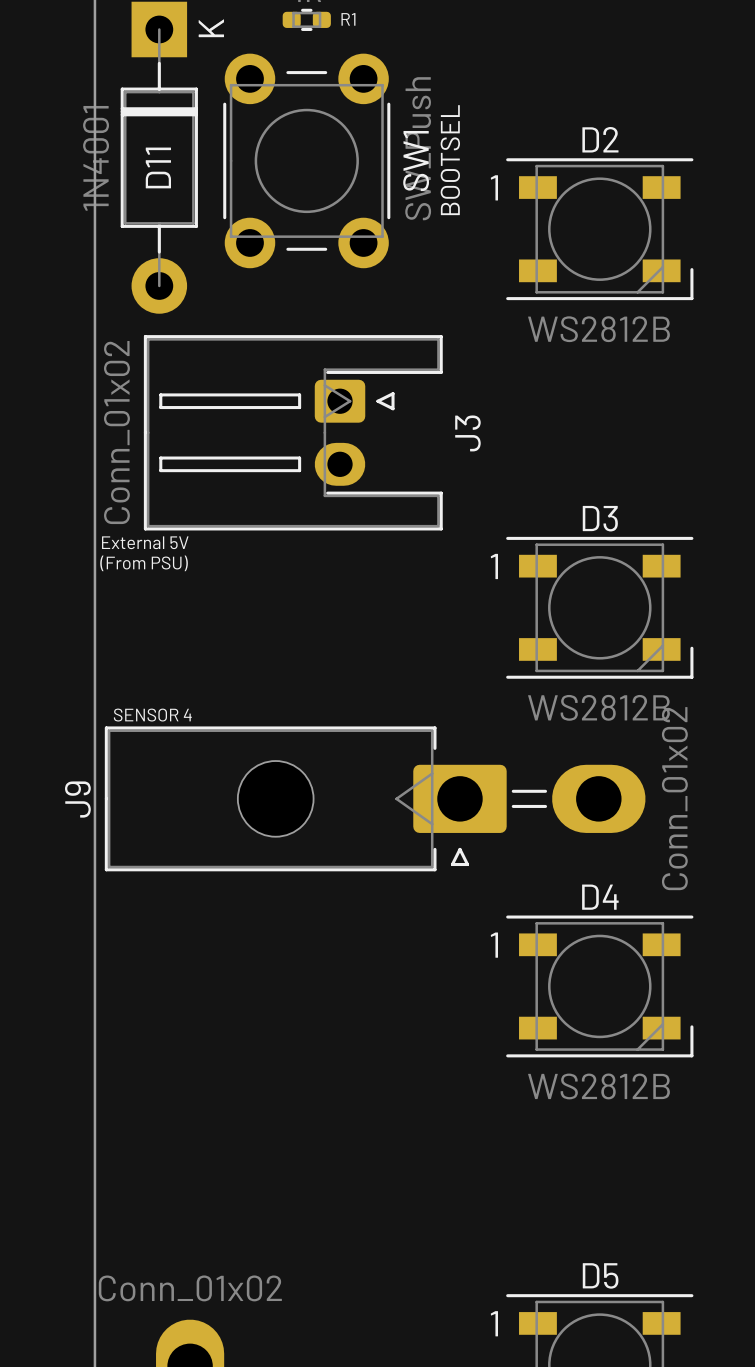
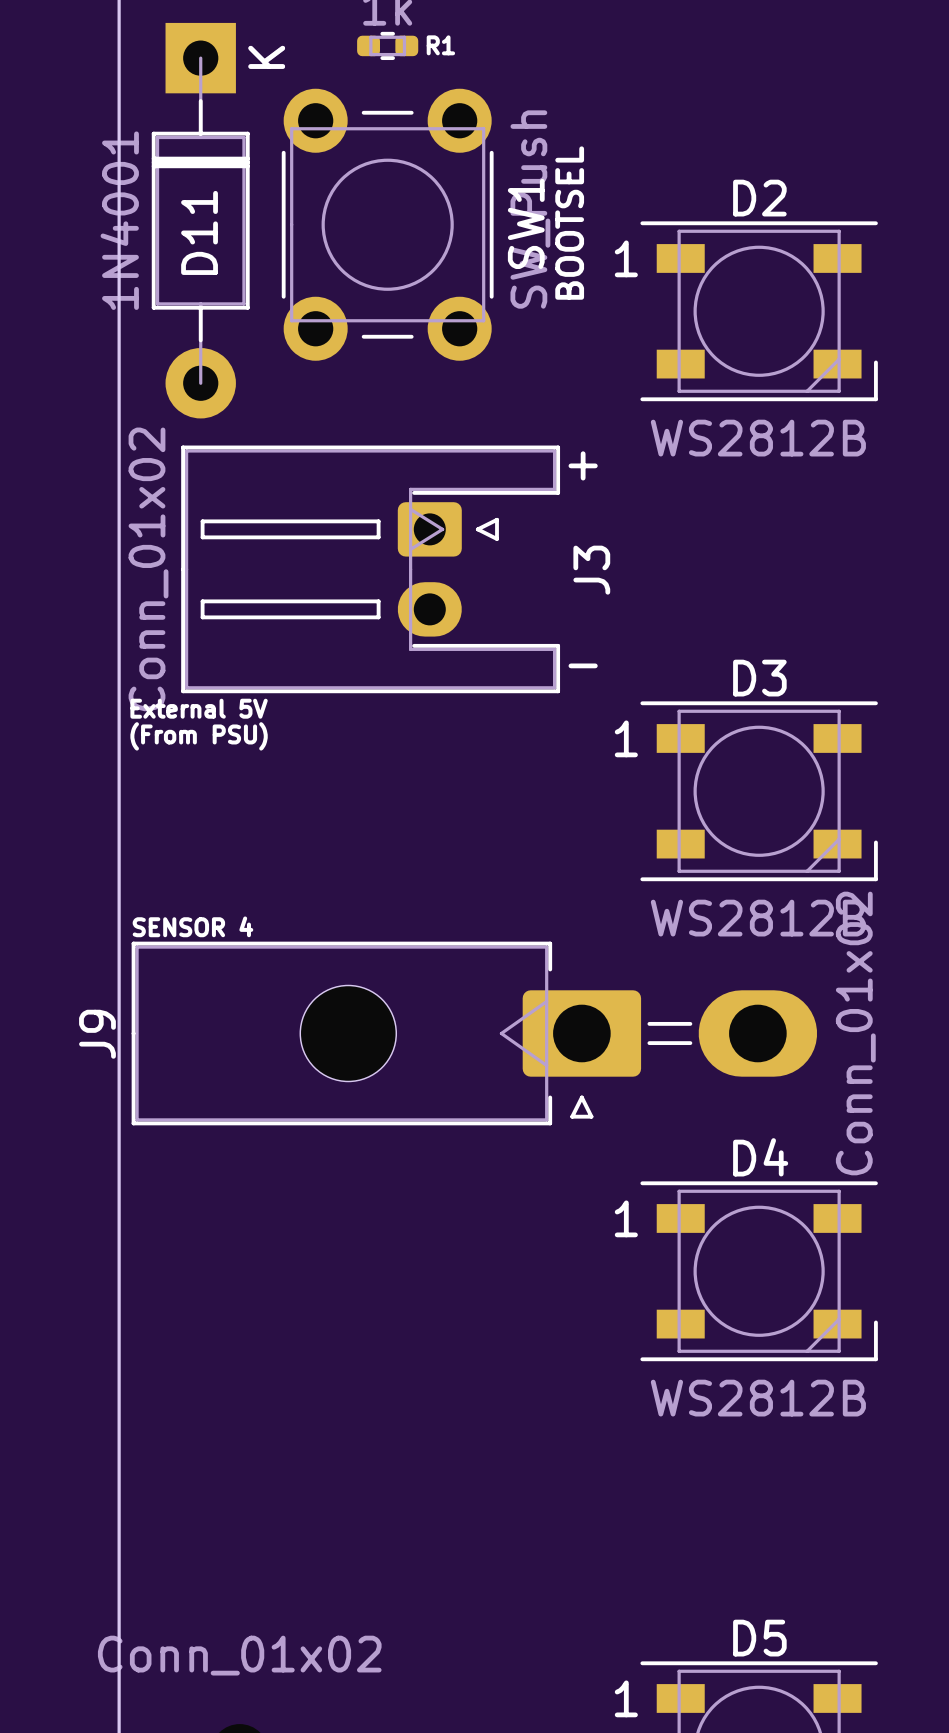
text: none -> + (583, 465)
text: none -> - (583, 665)

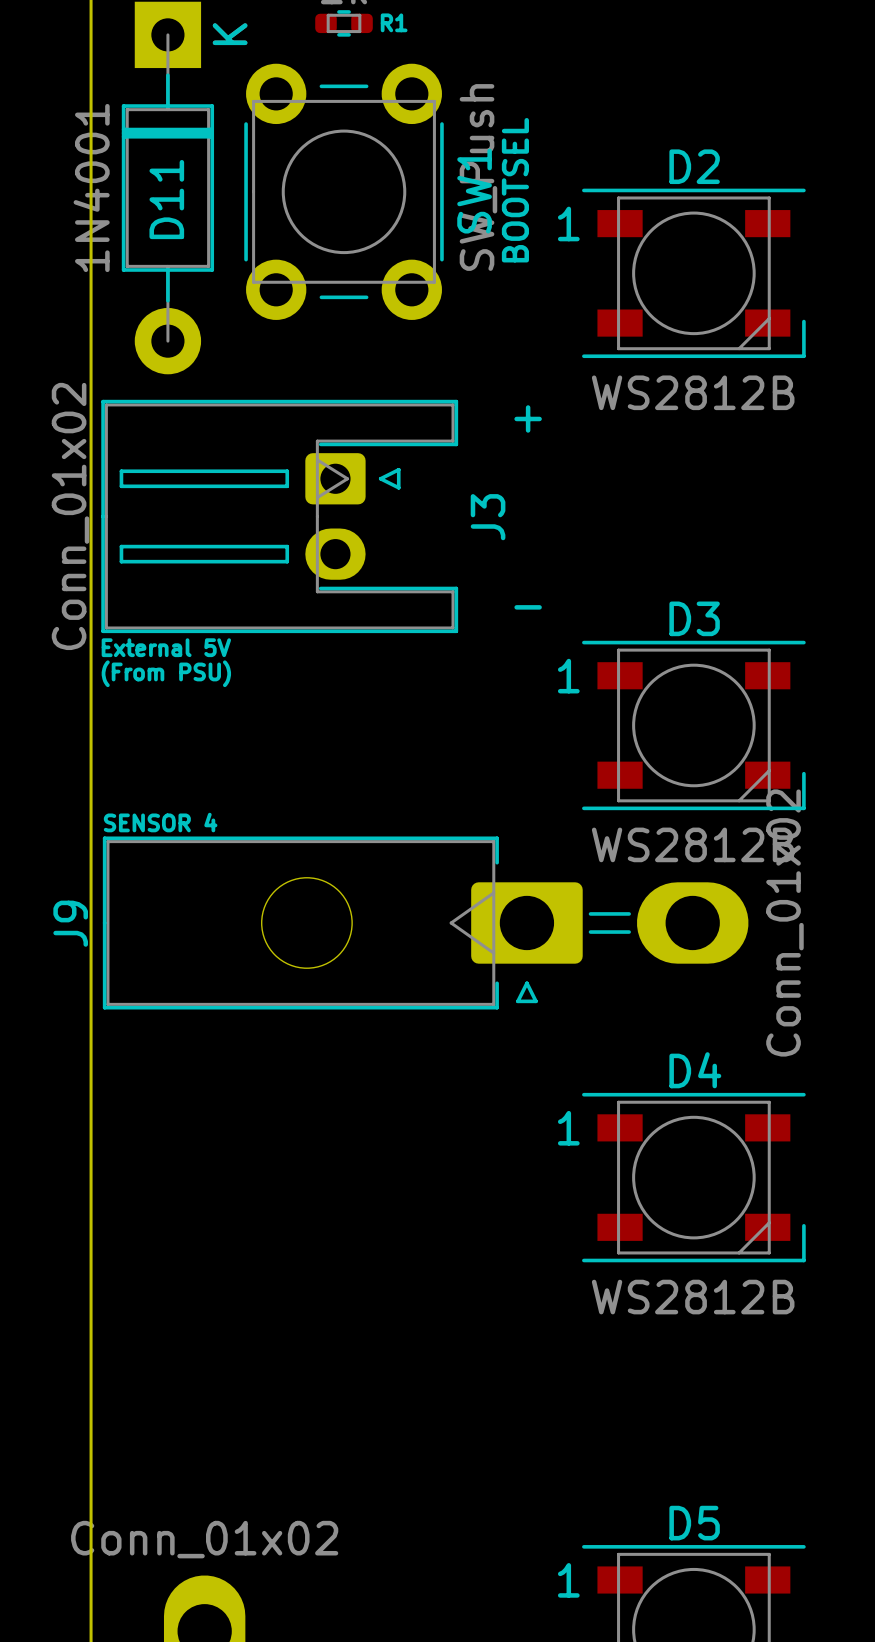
J3 position: (370, 569) -> (279, 516)
text position: SENSOR 4 (192, 926) -> SENSOR 4 (160, 822)
J9 position: (474, 1033) -> (425, 922)

